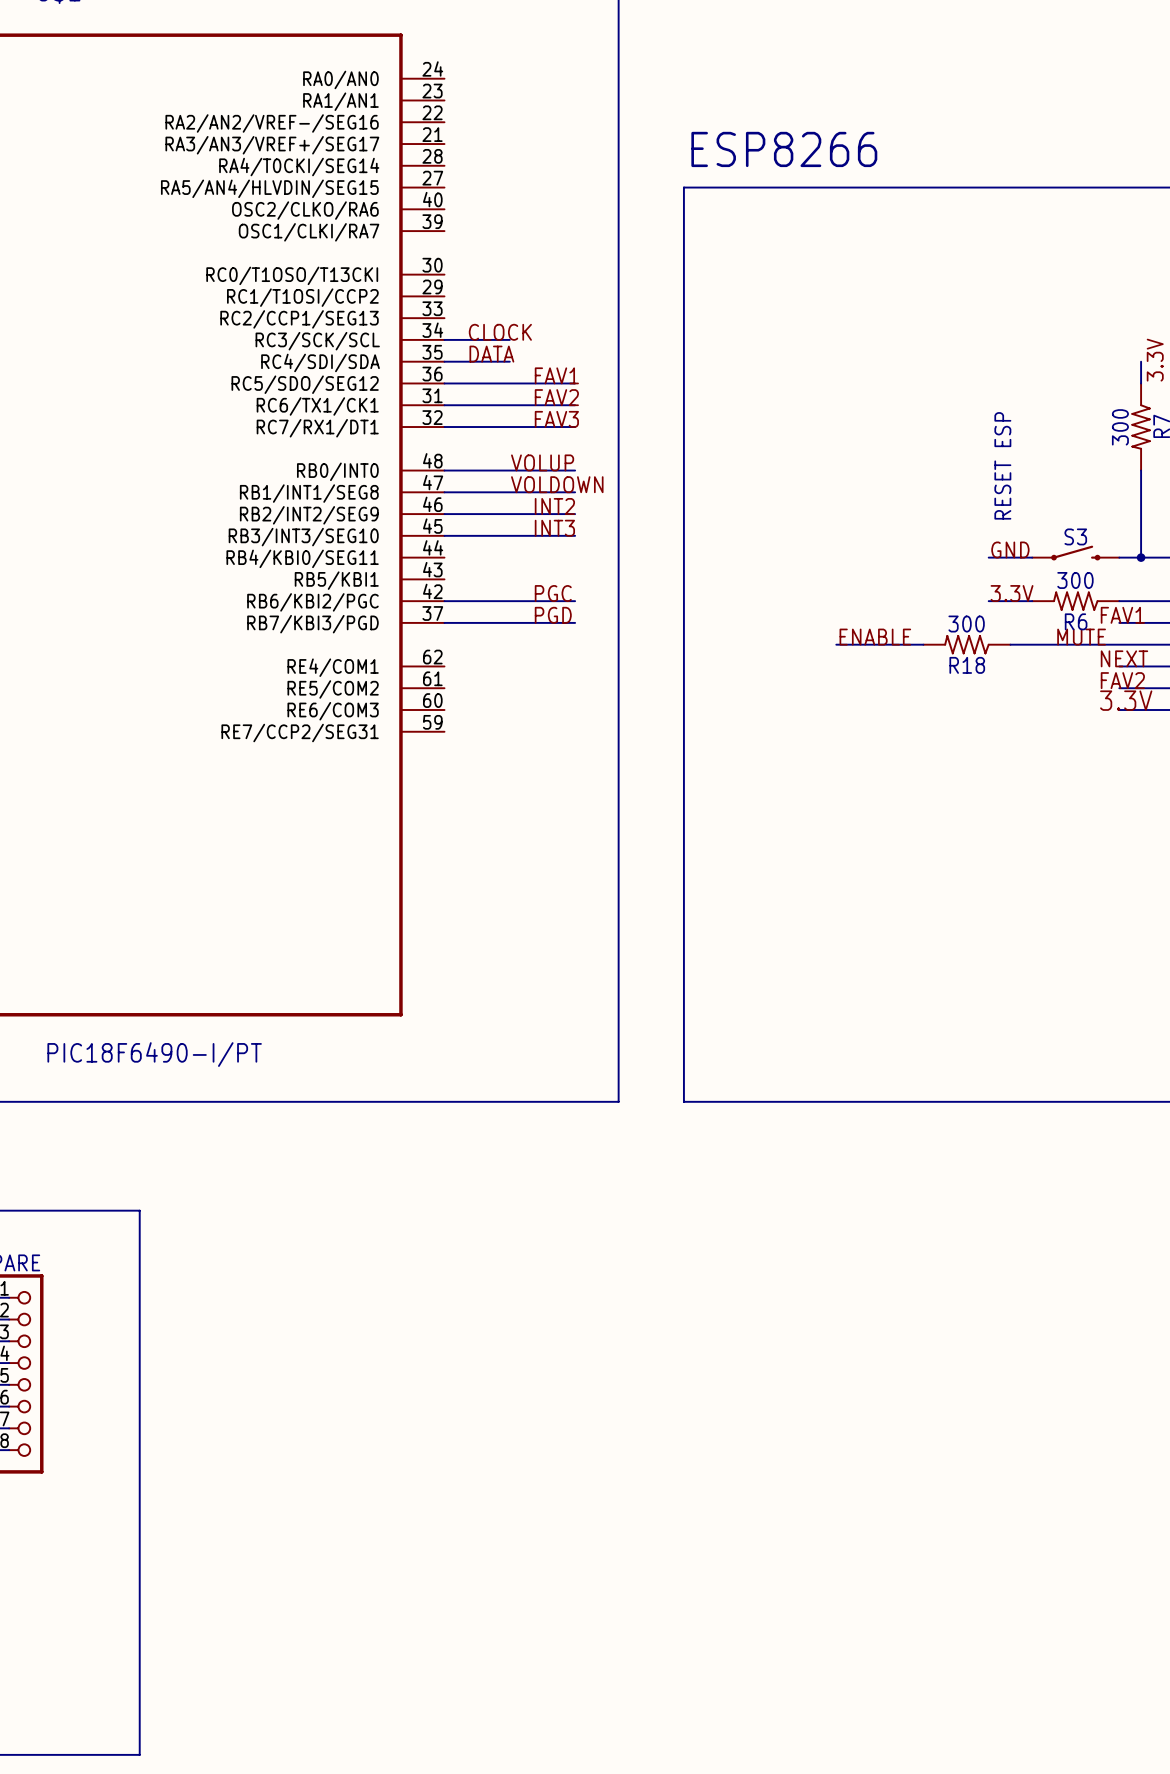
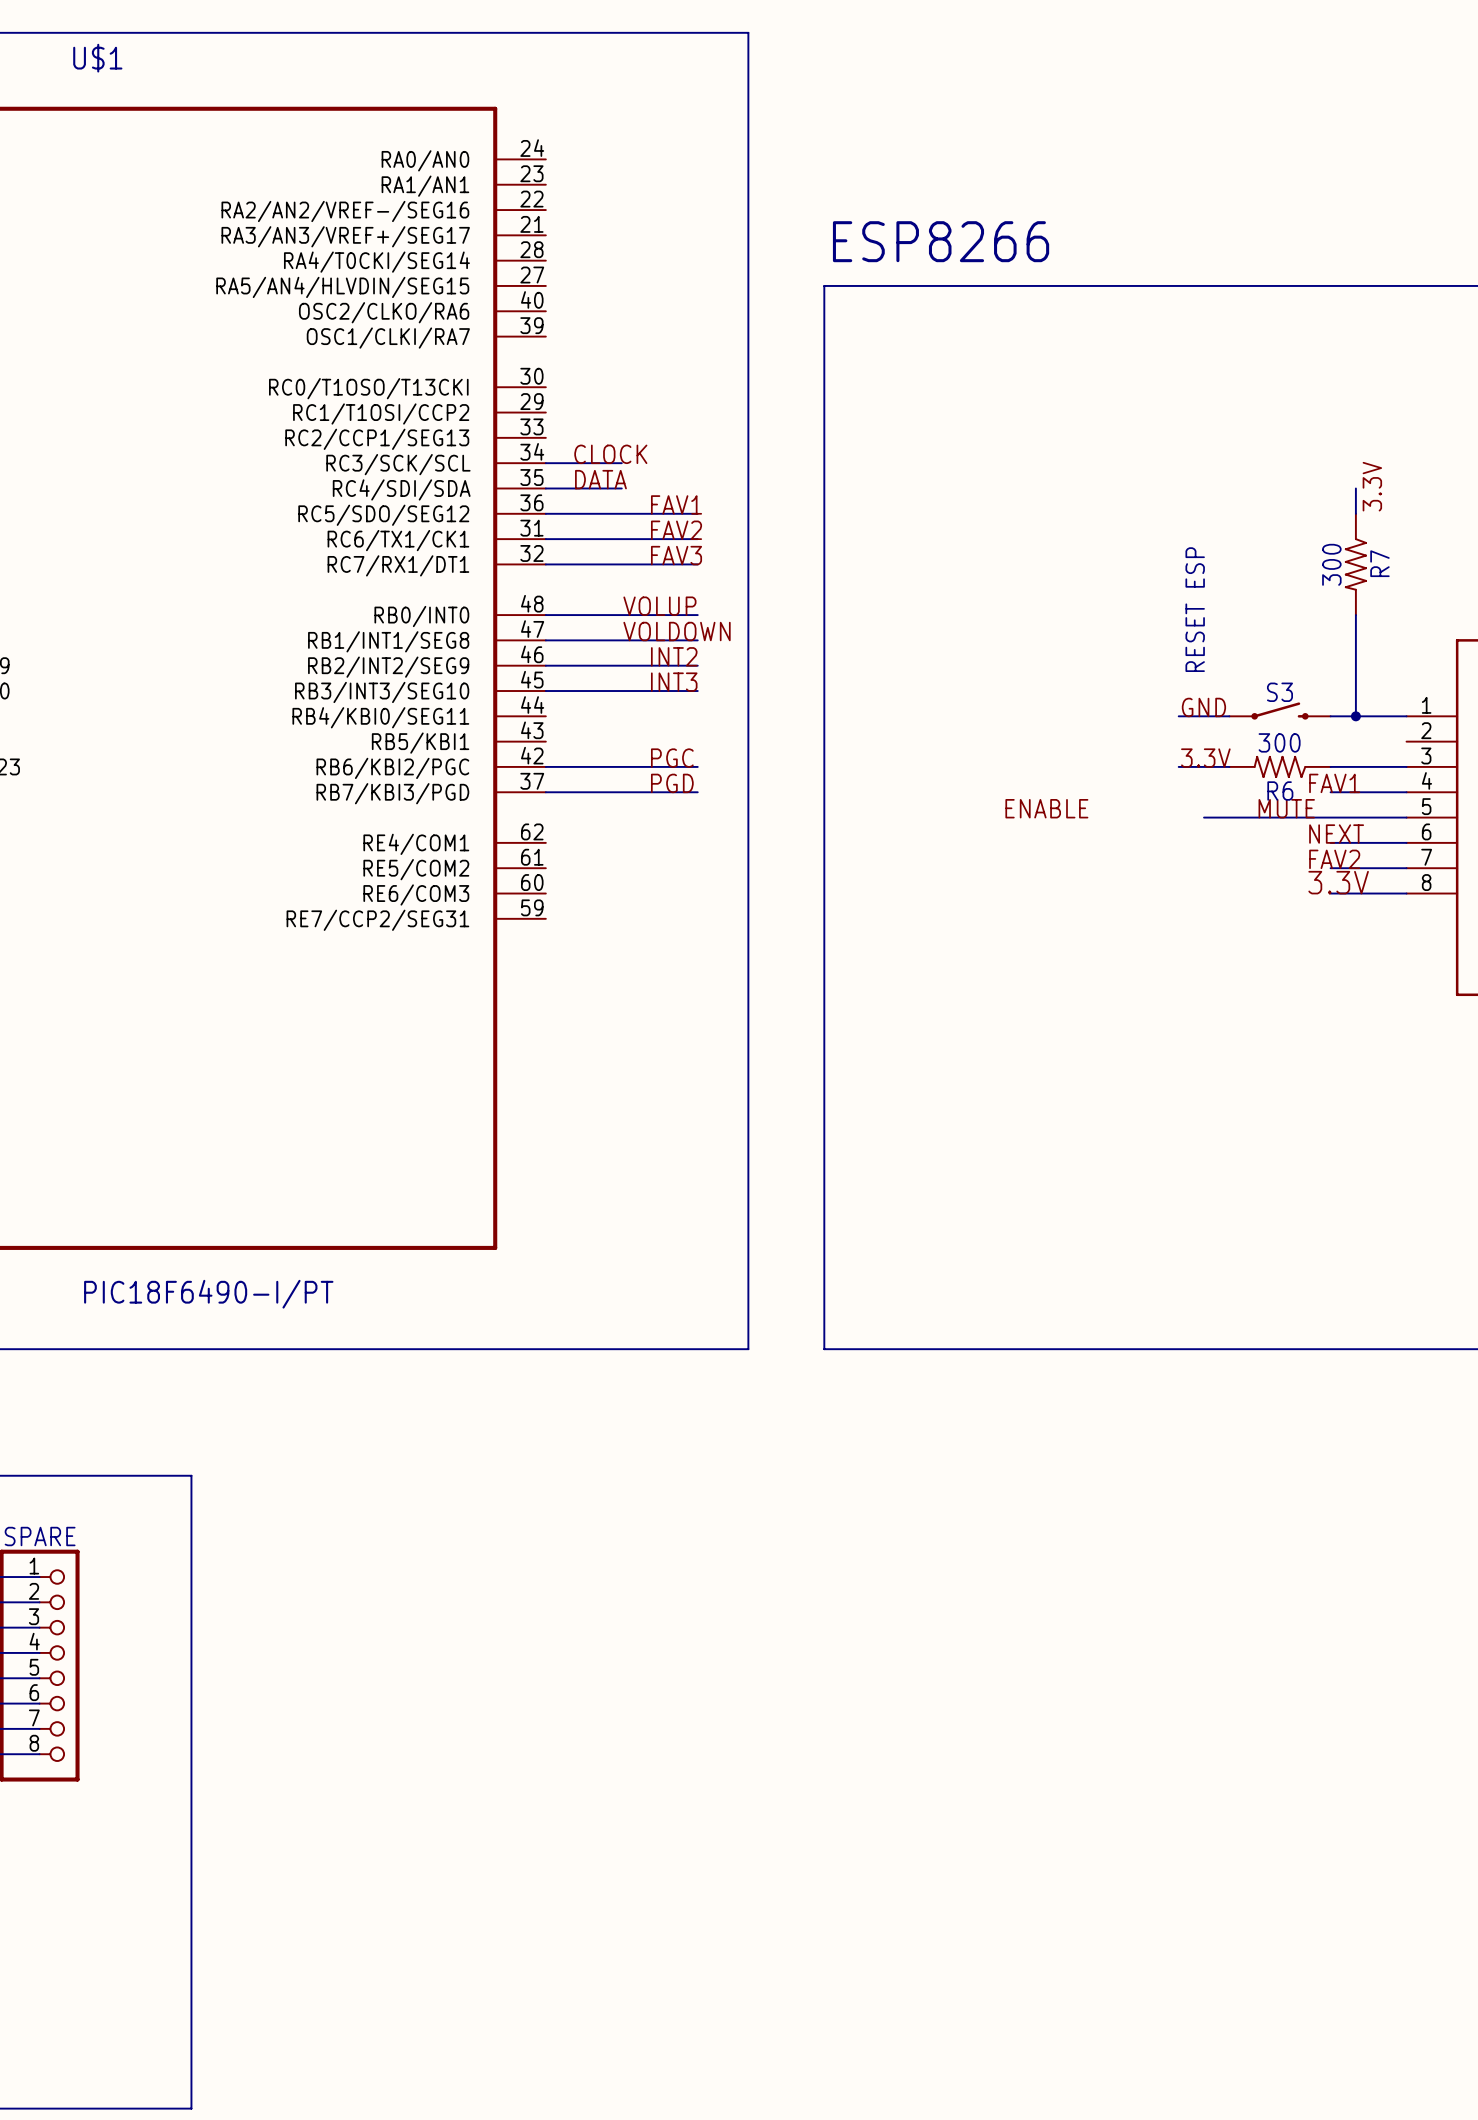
wire: (836, 644) (923, 644) -> none
R18: 300 (966, 644) -> none

